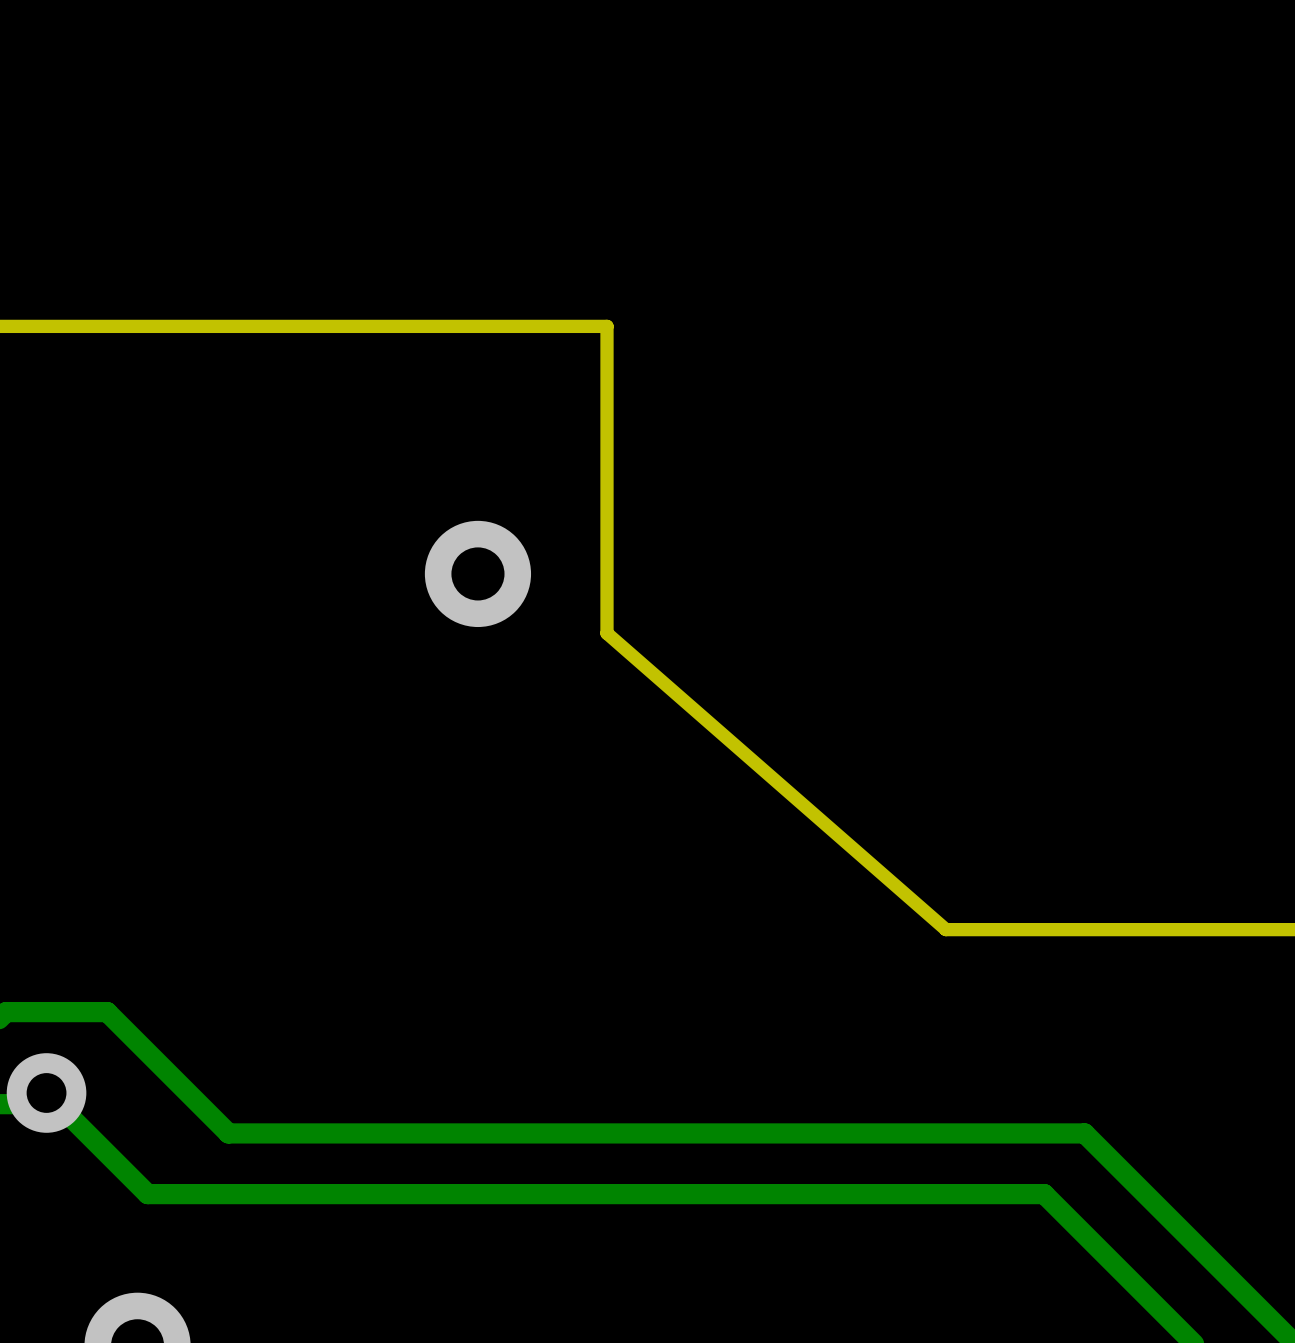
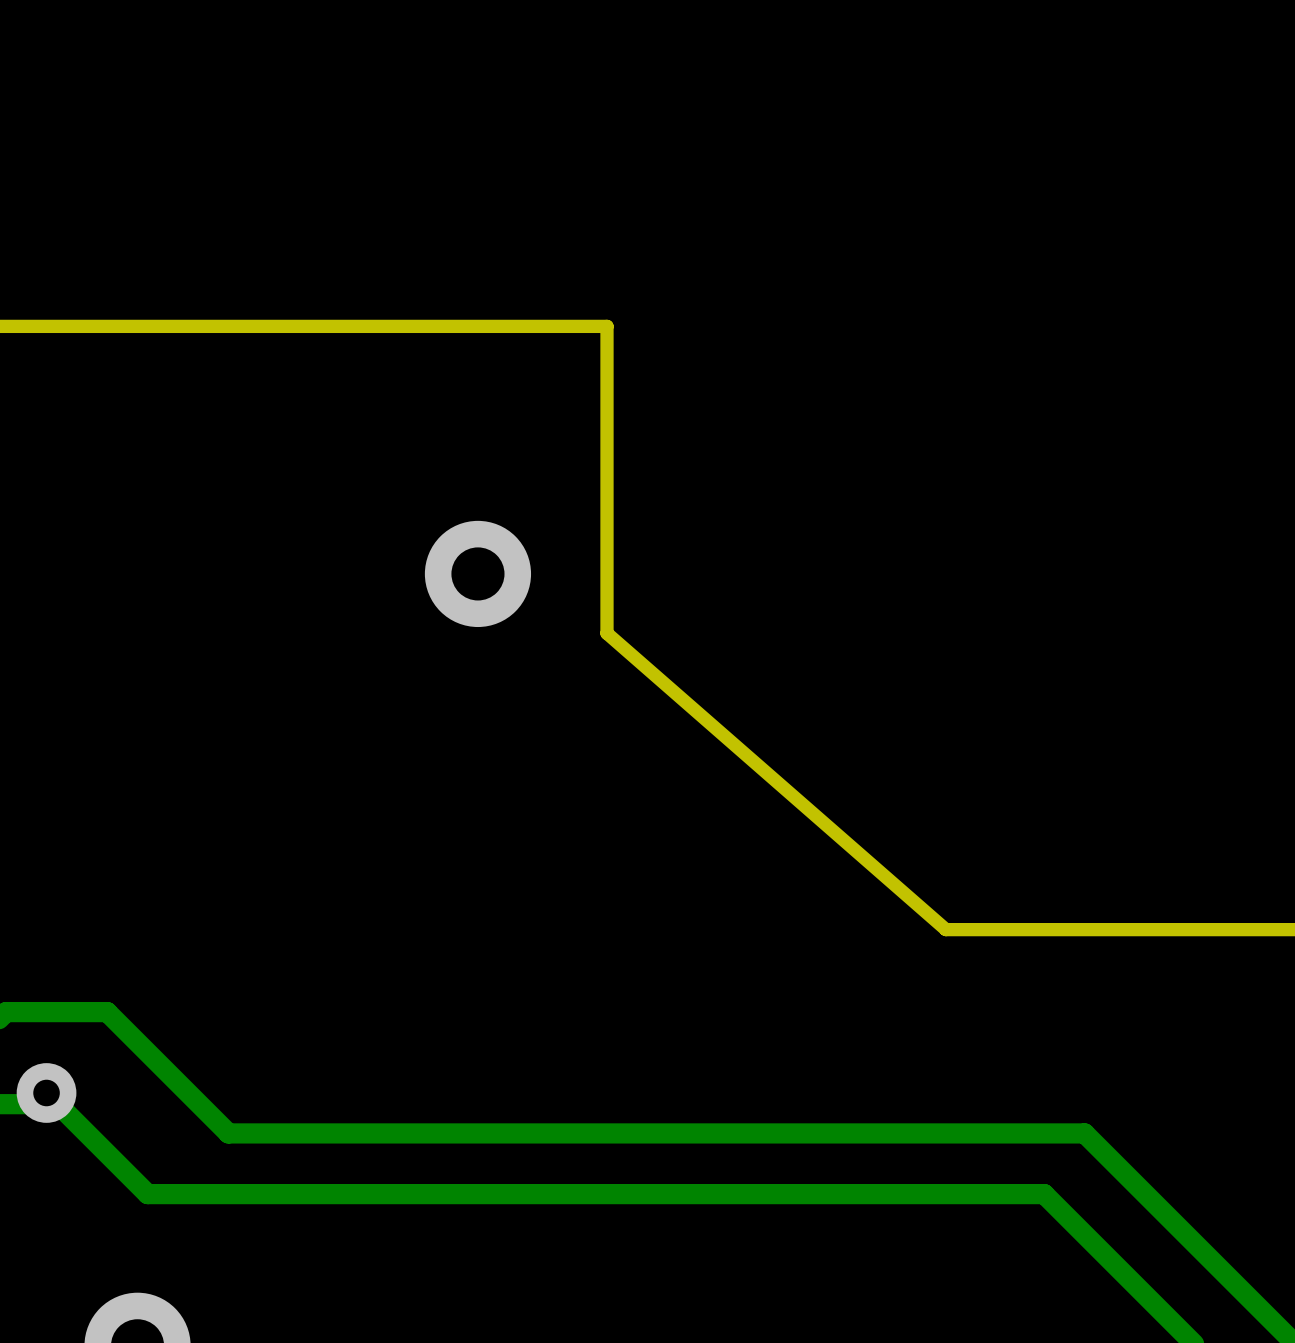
via size: [6, 1053, 87, 1133] -> [16, 1063, 77, 1123]

